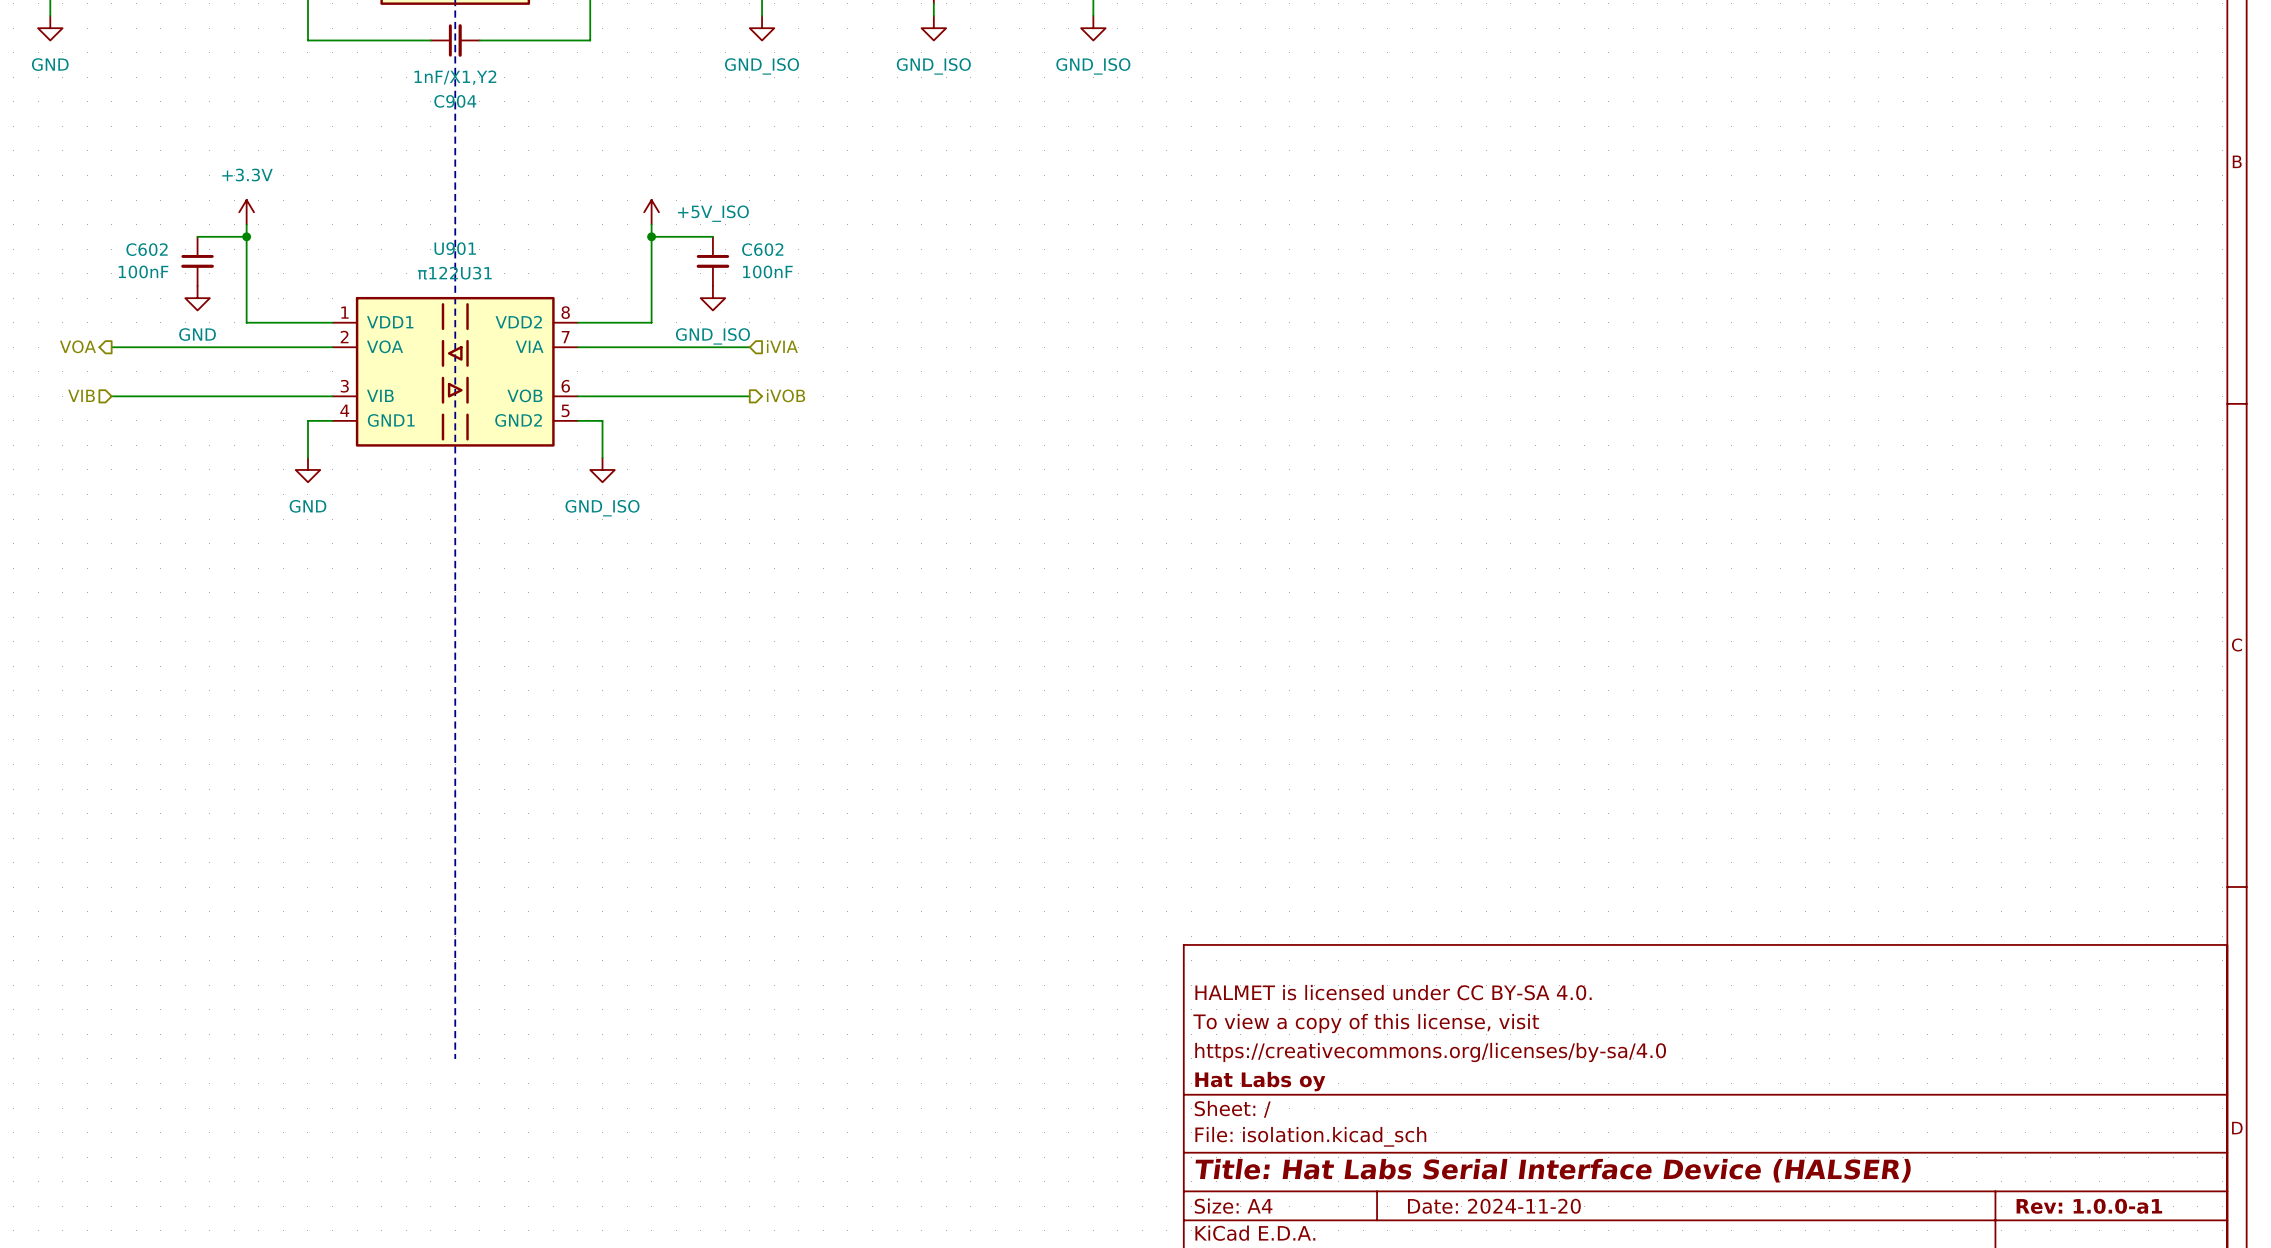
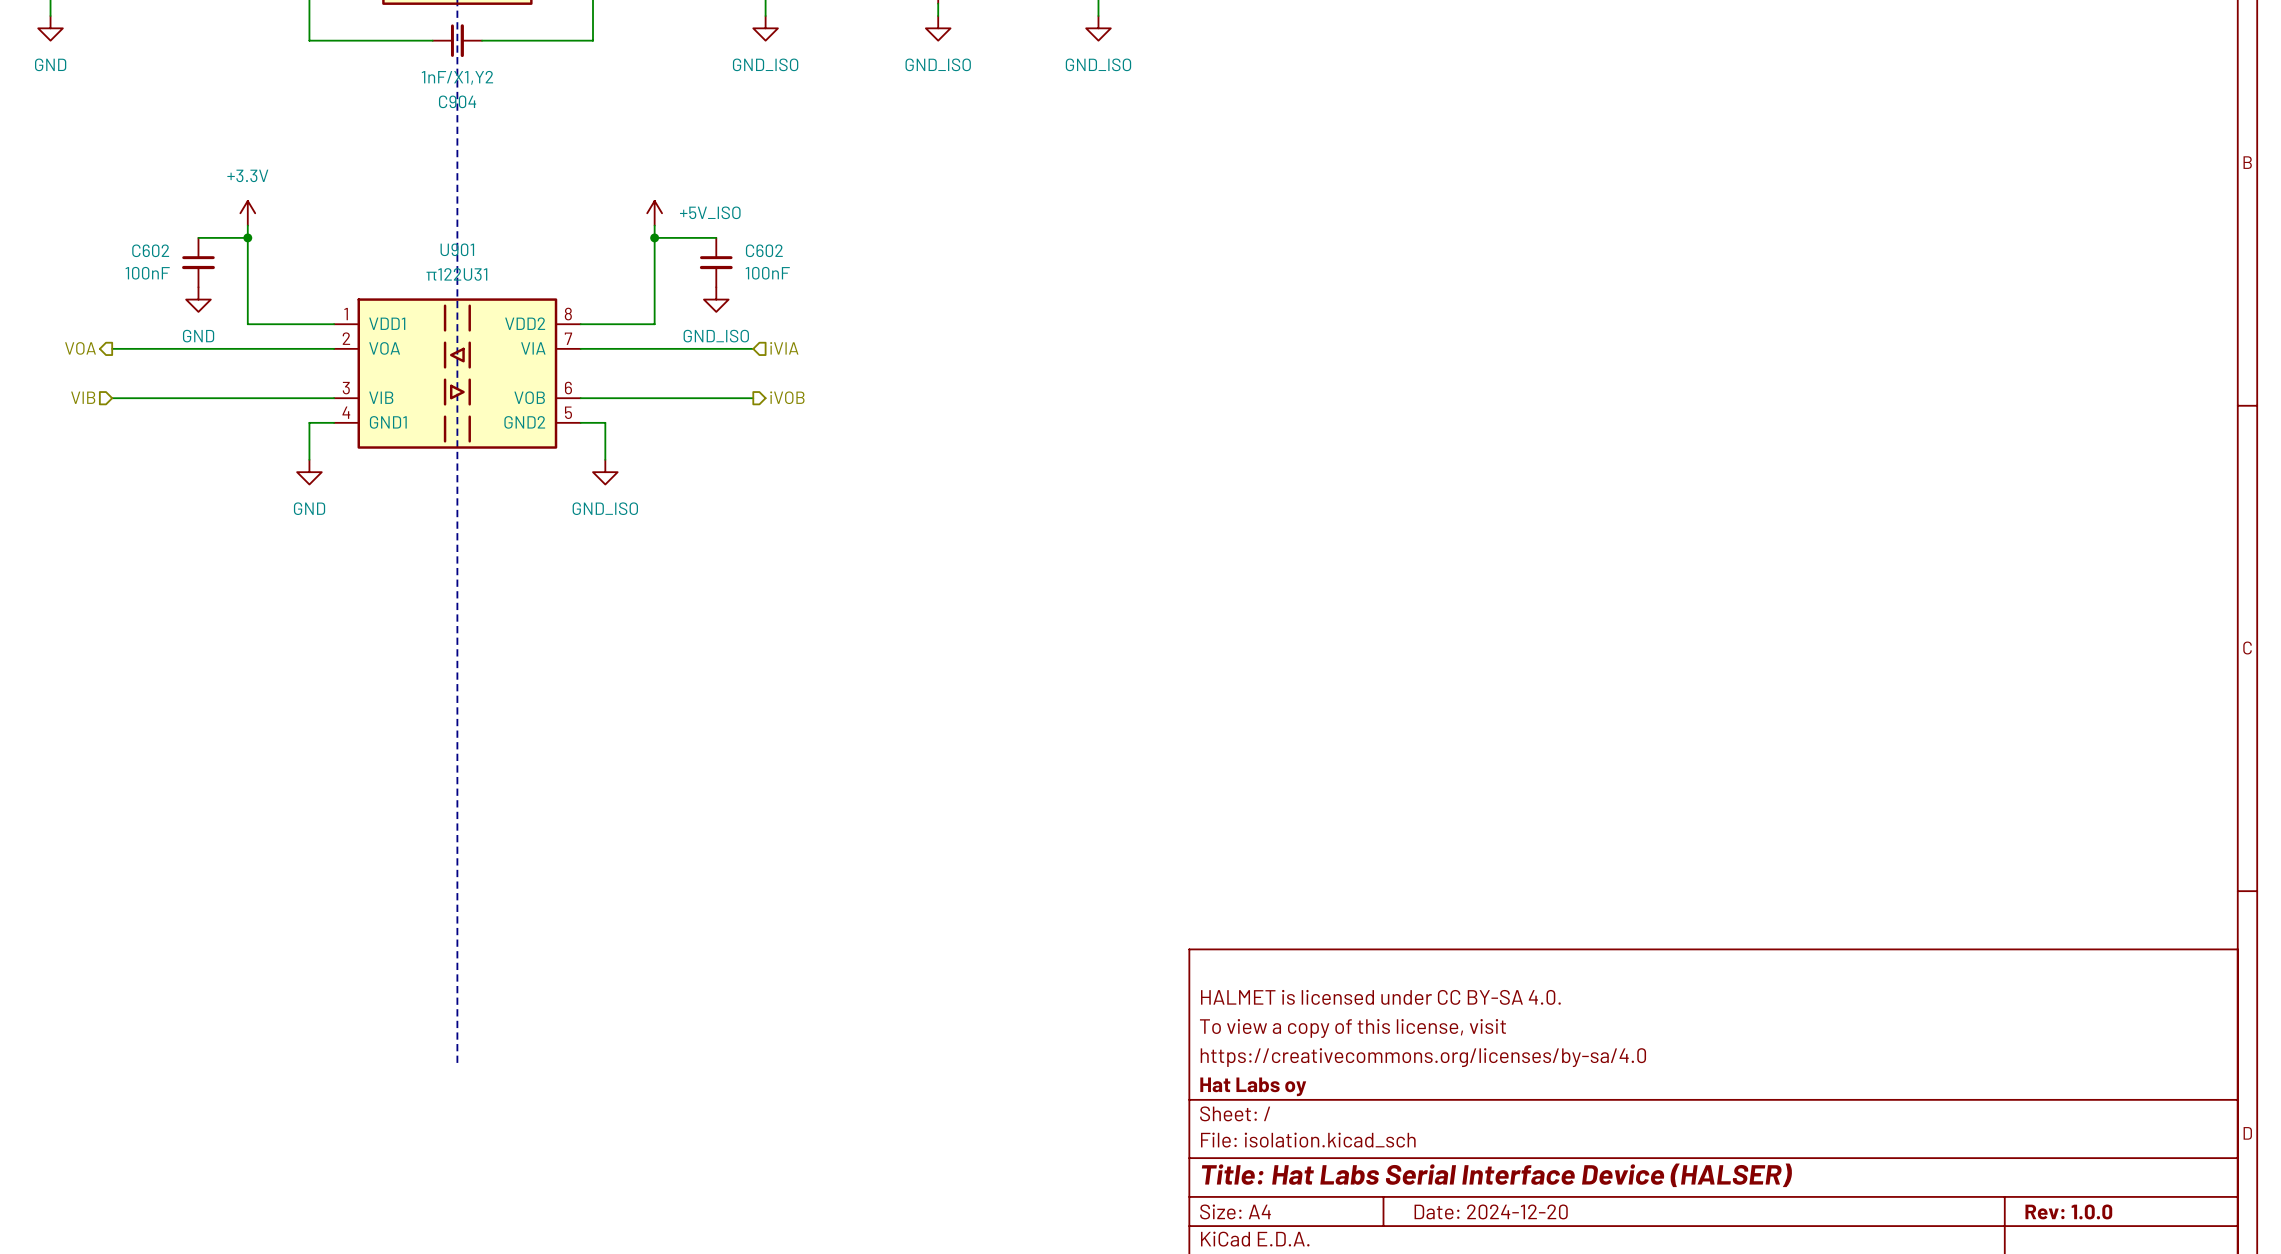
title block: Date: 2024-11-20 (1494, 1206) -> Date: 2024-12-20 (1491, 1211)
title block: Rev: 1.0.0-a1 (2089, 1206) -> Rev: 1.0.0 (2068, 1211)

